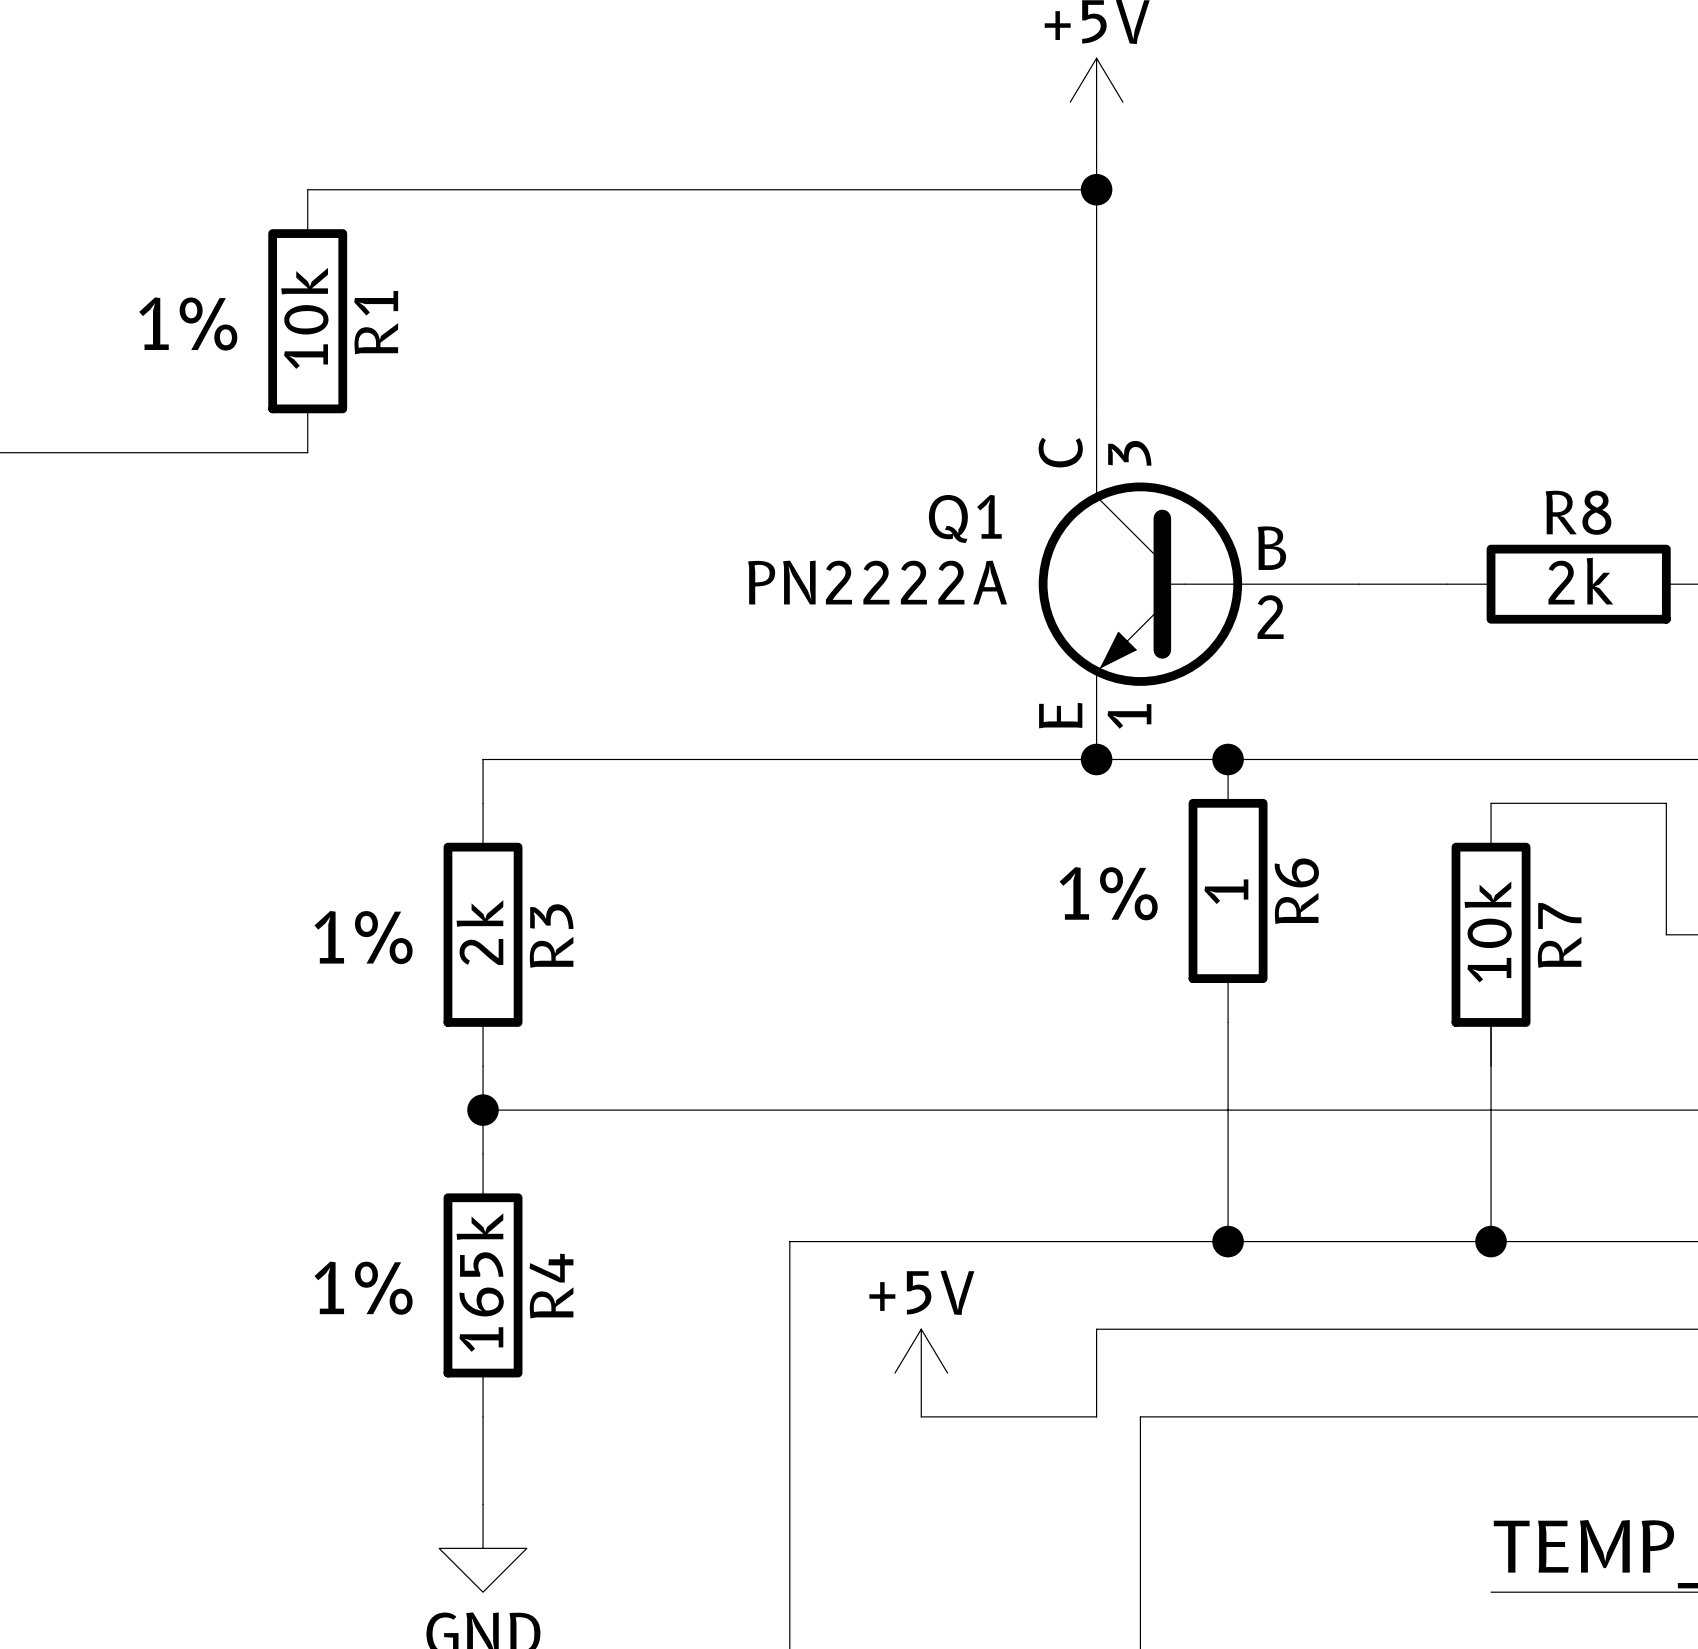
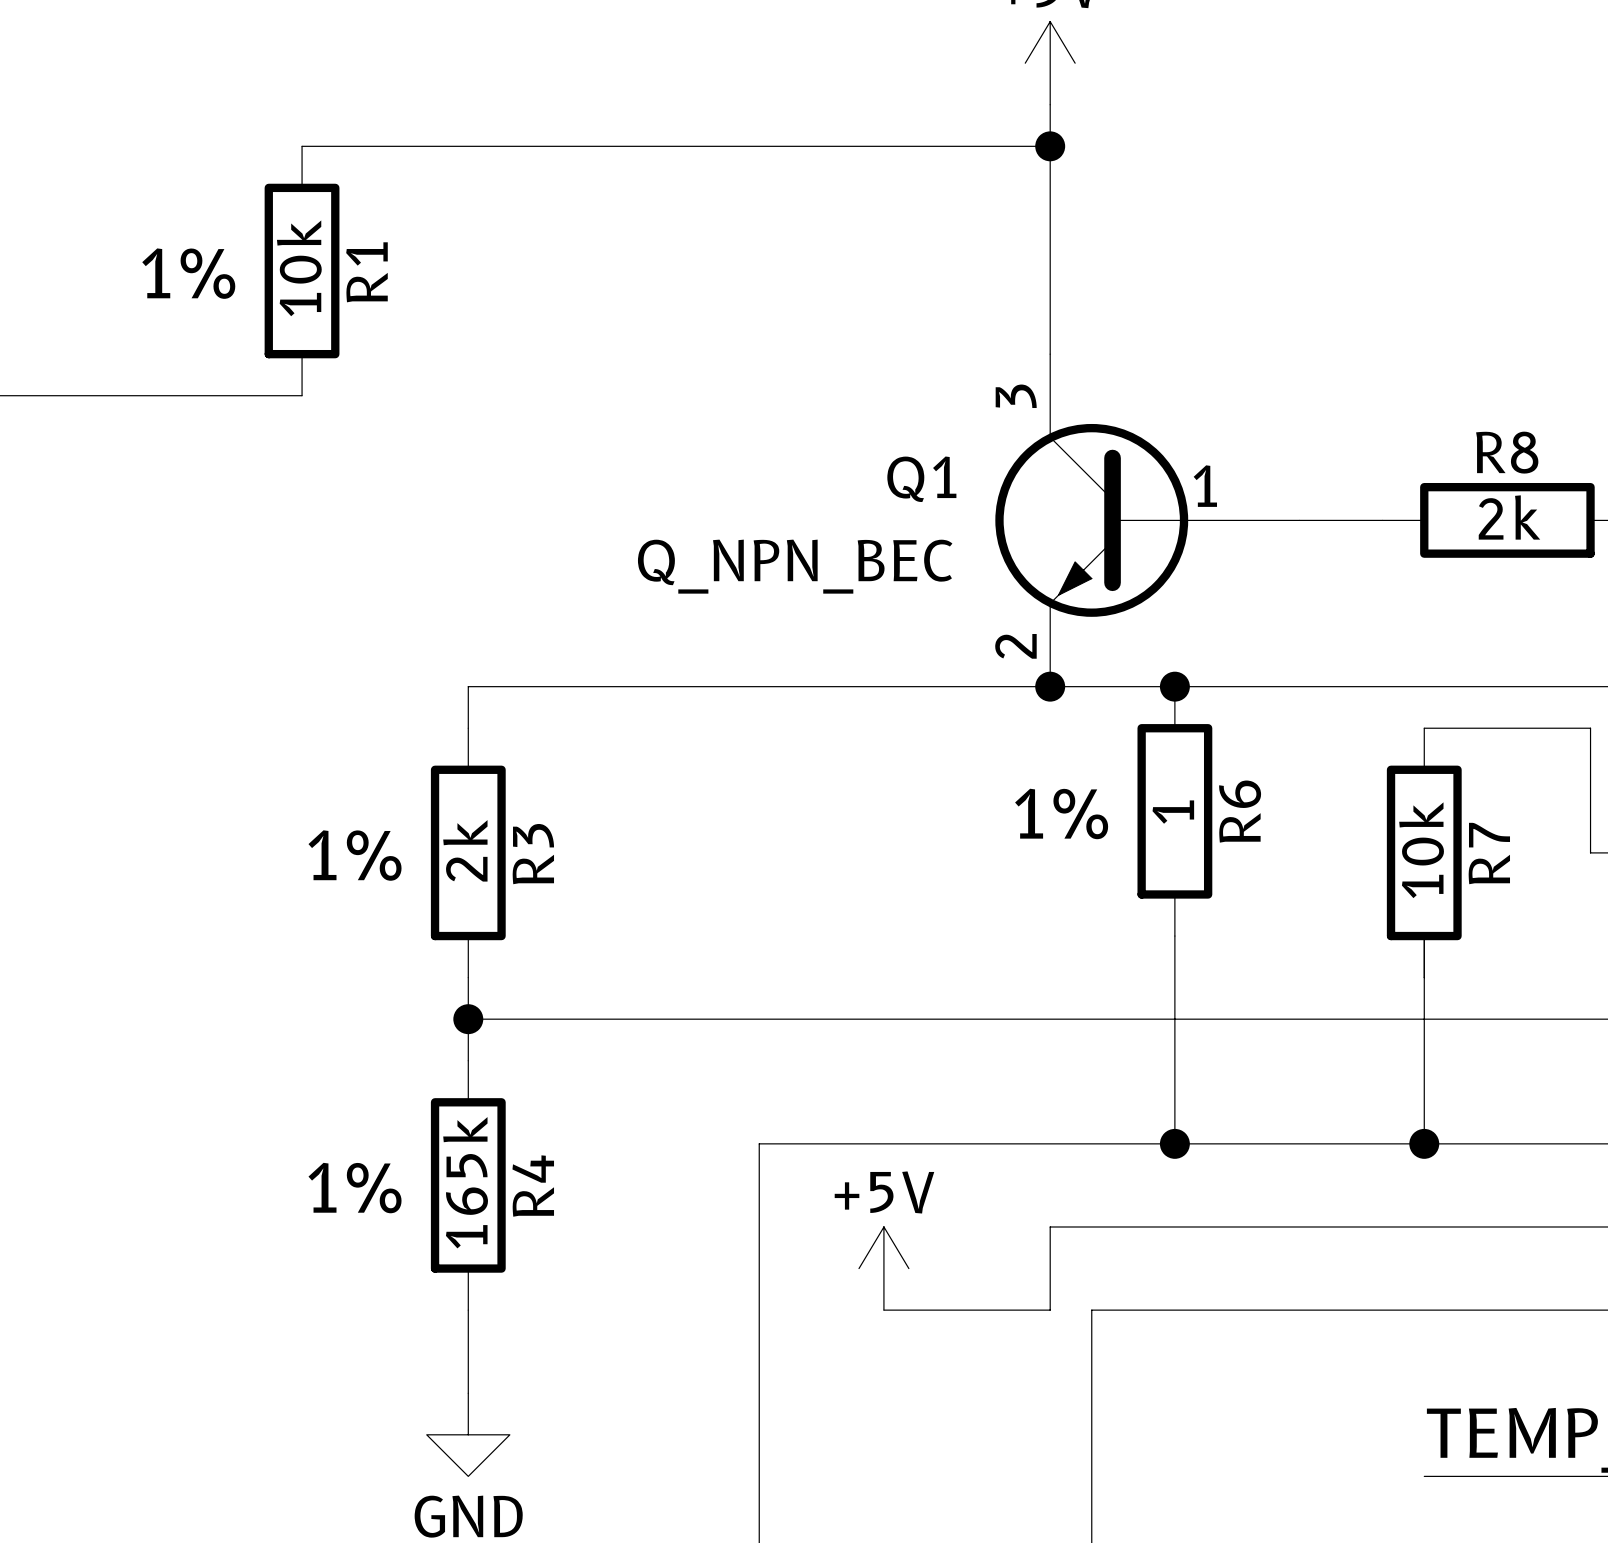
Q1 symbol: [1038, 408, 1360, 760] -> [995, 354, 1300, 687]
Q1 value: PN2222A (877, 582) -> Q_NPN_BEC (795, 566)

